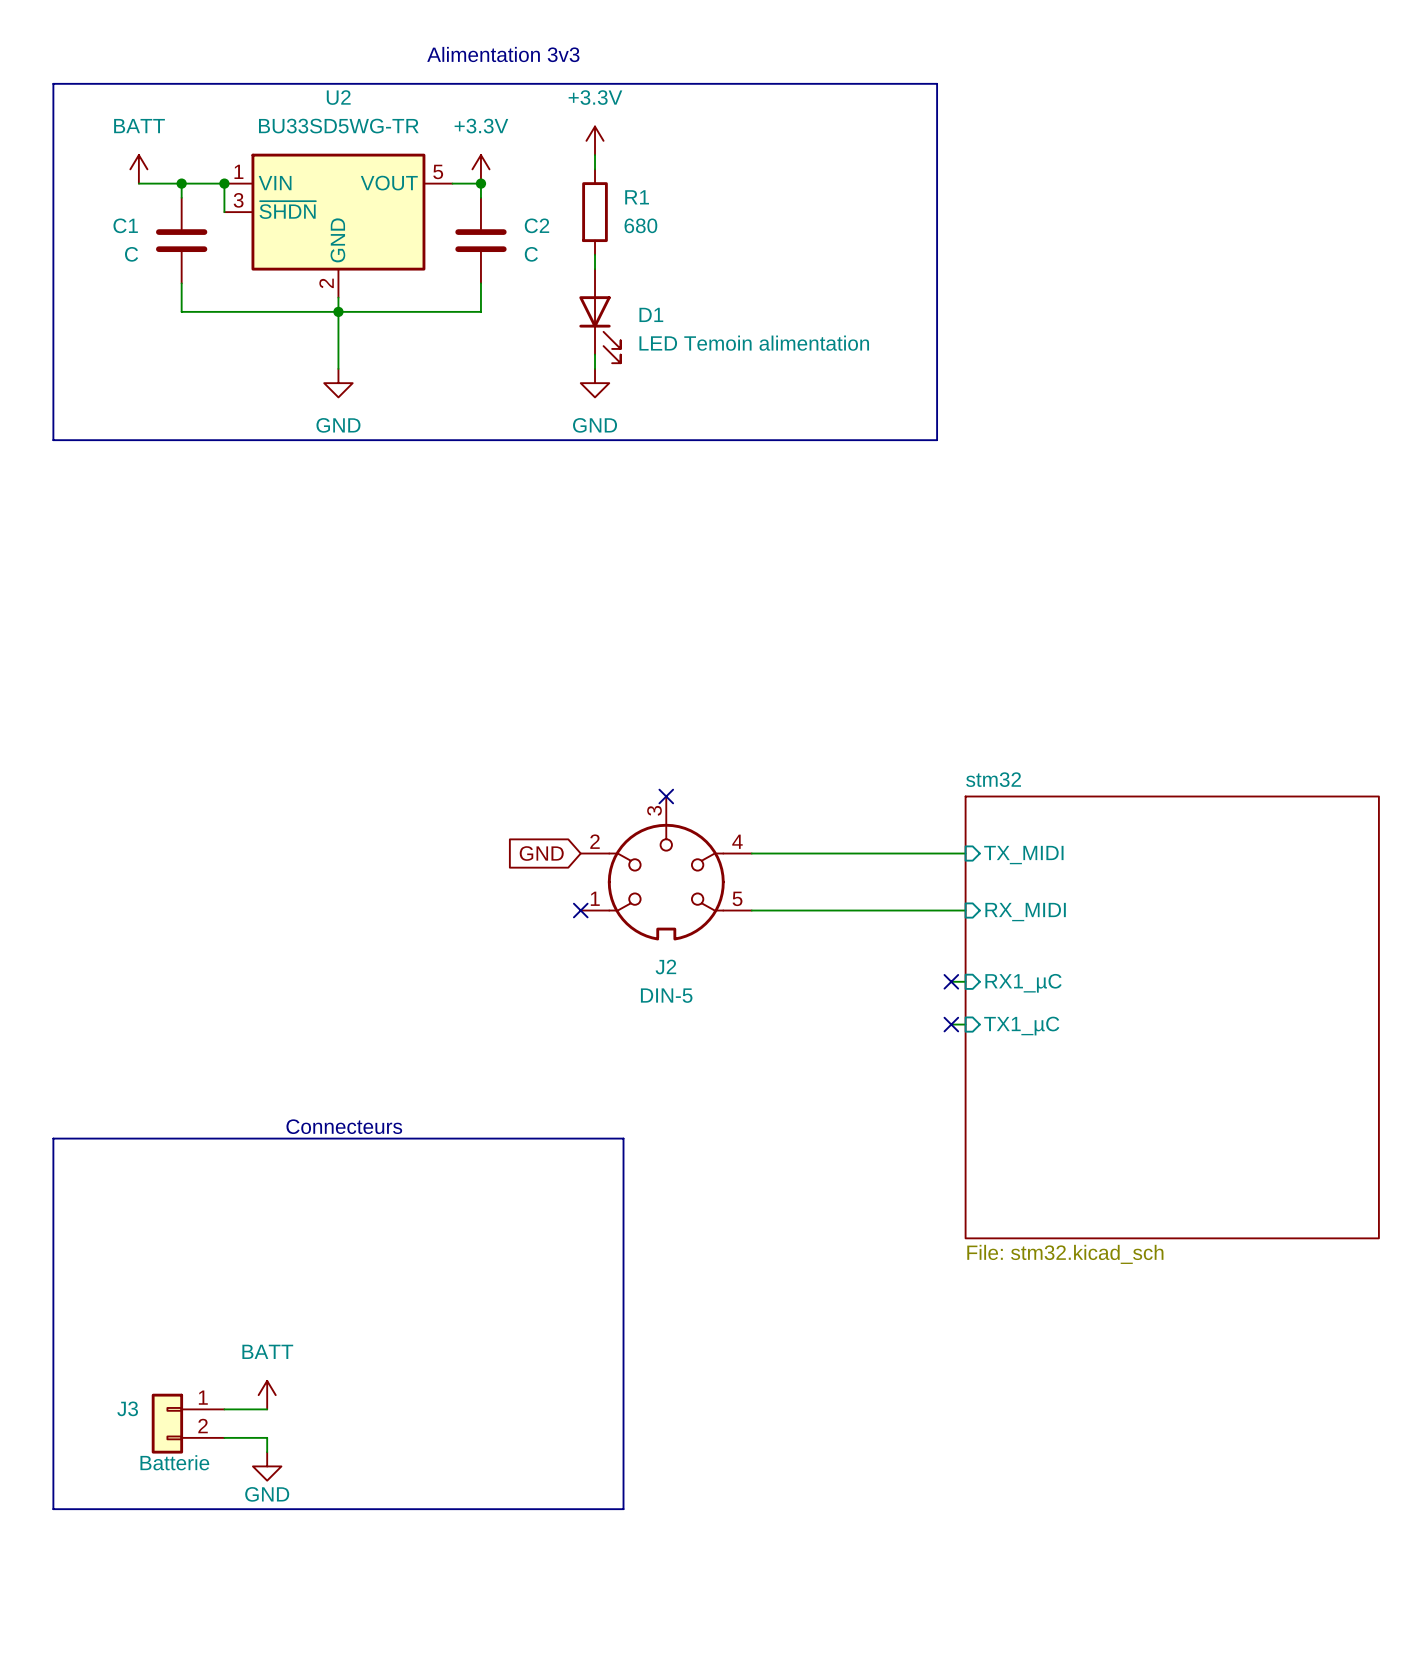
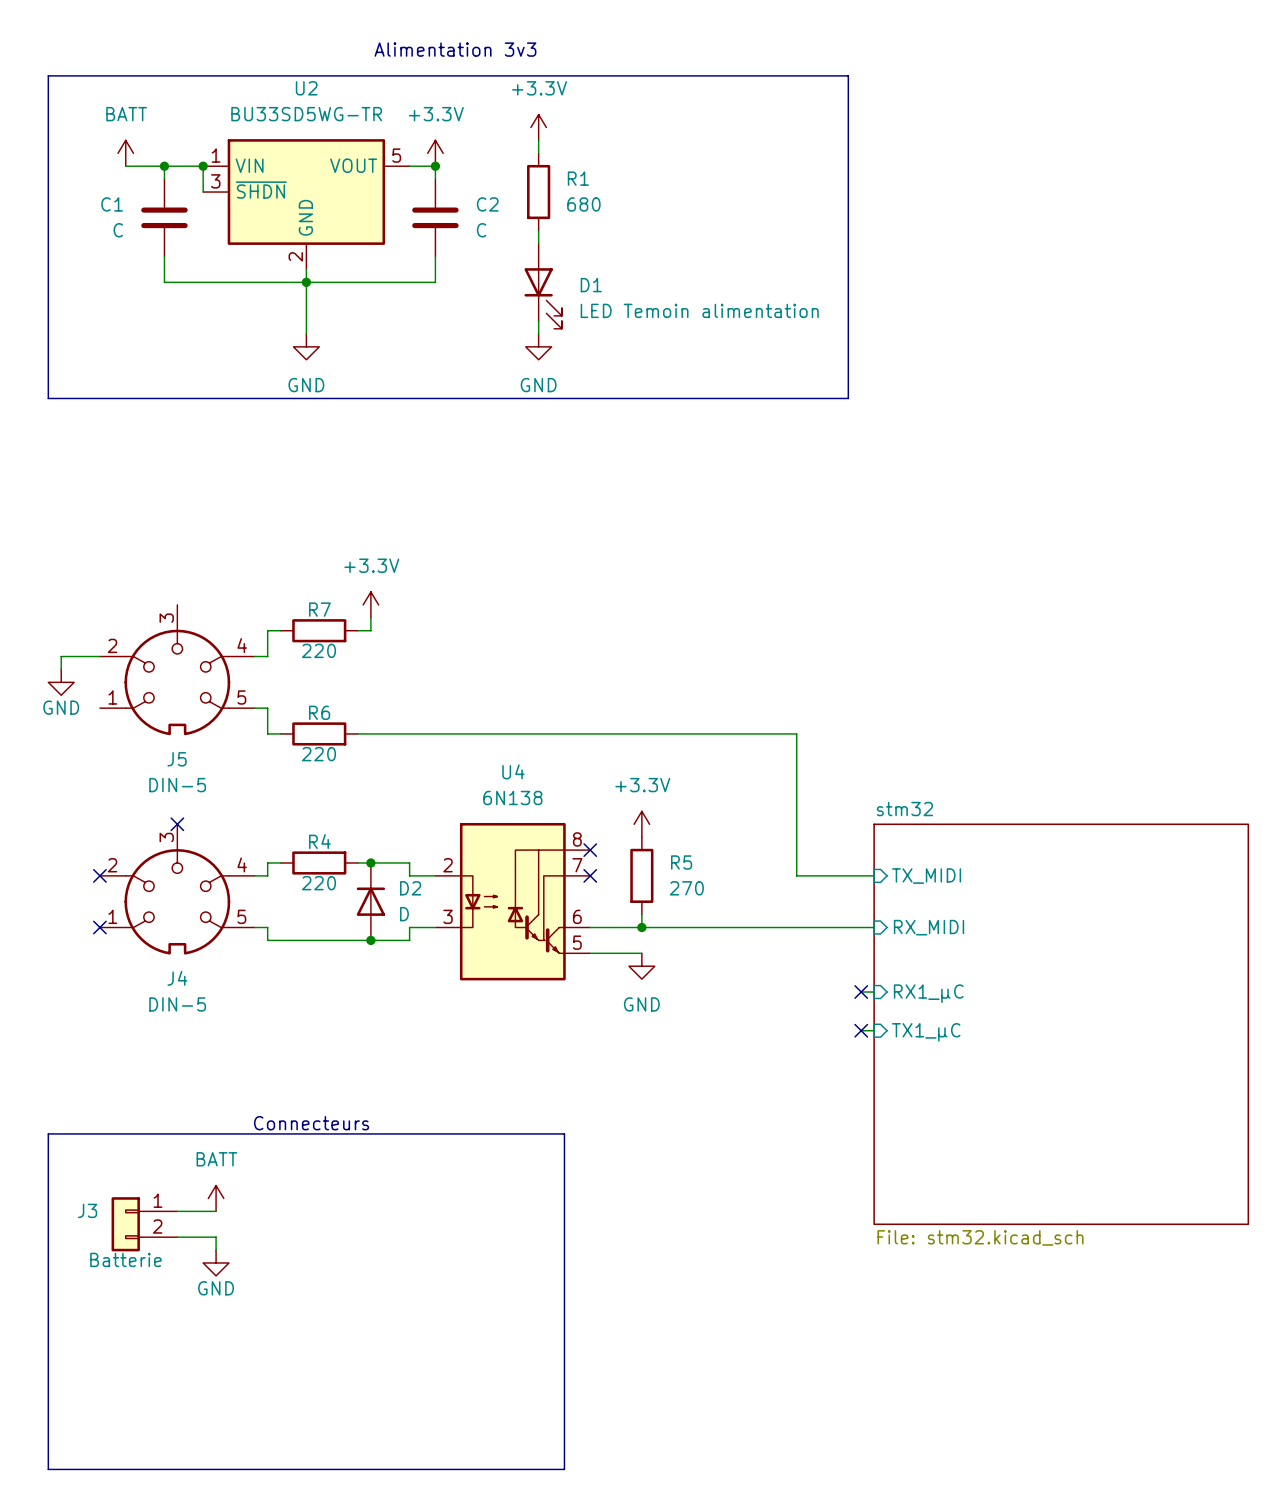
power symbol: none -> +3.3V (370, 604)
wire: none -> (370, 617) (370, 630) (358, 630)
wire: none -> (280, 630) (267, 630) (267, 656) (254, 656)
R7: none -> 220 (319, 630)
wire: none -> (99, 656) (61, 656) (61, 669)
J5: none -> DIN-5 (177, 670)
power symbol: none -> GND (61, 682)
wire: none -> (254, 708) (267, 708) (267, 733) (280, 733)
no-connect mark: (666, 796) -> none
R6: none -> 220 (319, 733)
wire: none -> (358, 733) (796, 733) (796, 875) (874, 875)
global label: GND (541, 853) -> none
wire: (751, 853) (965, 853) -> none
sheet pin position: TX_MIDI (1023, 855) -> TX_MIDI (926, 876)
J2: DIN-5 (666, 868) -> none
no-connect mark: none -> (177, 824)
no-connect mark: (580, 910) -> none
power symbol: none -> +3.3V (641, 824)
wire: (751, 910) (965, 910) -> none
sheet pin: RX_MIDI (1025, 912) -> none
no-connect mark: none -> (590, 850)
wire: none -> (280, 862) (267, 862) (267, 875) (254, 875)
R4: none -> 220 (319, 862)
wire: none -> (358, 862) (409, 862) (409, 875) (435, 875)
junction: none -> (370, 862)
no-connect mark: none -> (99, 875)
no-connect mark: none -> (590, 875)
R5: none -> 270 (641, 875)
wire: (951, 981) (965, 981) -> (861, 992) (874, 992)
no-connect mark: (951, 981) -> none
J4: none -> DIN-5 (177, 889)
sheet pin position: RX1_µC (1023, 983) -> RX1_µC (928, 993)
D2: none -> D (370, 901)
U4: none -> 6N138 (512, 901)
wire: none -> (641, 914) (641, 927)
sheet stm32 position: (1172, 1017) -> (1061, 1024)
no-connect mark: none -> (99, 927)
wire: none -> (254, 927) (267, 927) (267, 940) (409, 940) (409, 927) (435, 927)
wire: none -> (590, 927) (861, 927)
junction: none -> (641, 927)
no-connect mark: (951, 1024) -> none
sheet pin: TX1_µC (1021, 1026) -> RX_MIDI (929, 927)
junction: none -> (370, 940)
wire: none -> (590, 953) (641, 953)
power symbol: none -> GND (641, 966)
no-connect mark: none -> (861, 992)
text position: Connecteurs (344, 1126) -> Connecteurs (311, 1123)
wire: none -> (861, 1030) (874, 1030)
no-connect mark: none -> (861, 1030)
sheet pin: none -> TX1_µC (926, 1032)
line: (53, 1252) (53, 1138) (623, 1138) (623, 1252) -> (48, 1133) (564, 1133)
power symbol position: BATT (267, 1395) -> BATT (216, 1198)
wire: (224, 1409) (267, 1409) -> (177, 1211) (216, 1211)
J3 position: (188, 1423) -> (144, 1224)
wire: (224, 1437) (267, 1437) (267, 1452) -> (177, 1237) (216, 1237) (216, 1250)
power symbol position: GND (267, 1466) -> GND (216, 1262)
line: (53, 1509) (623, 1509) -> (48, 1366) (48, 1469) (564, 1469) (564, 1366)

